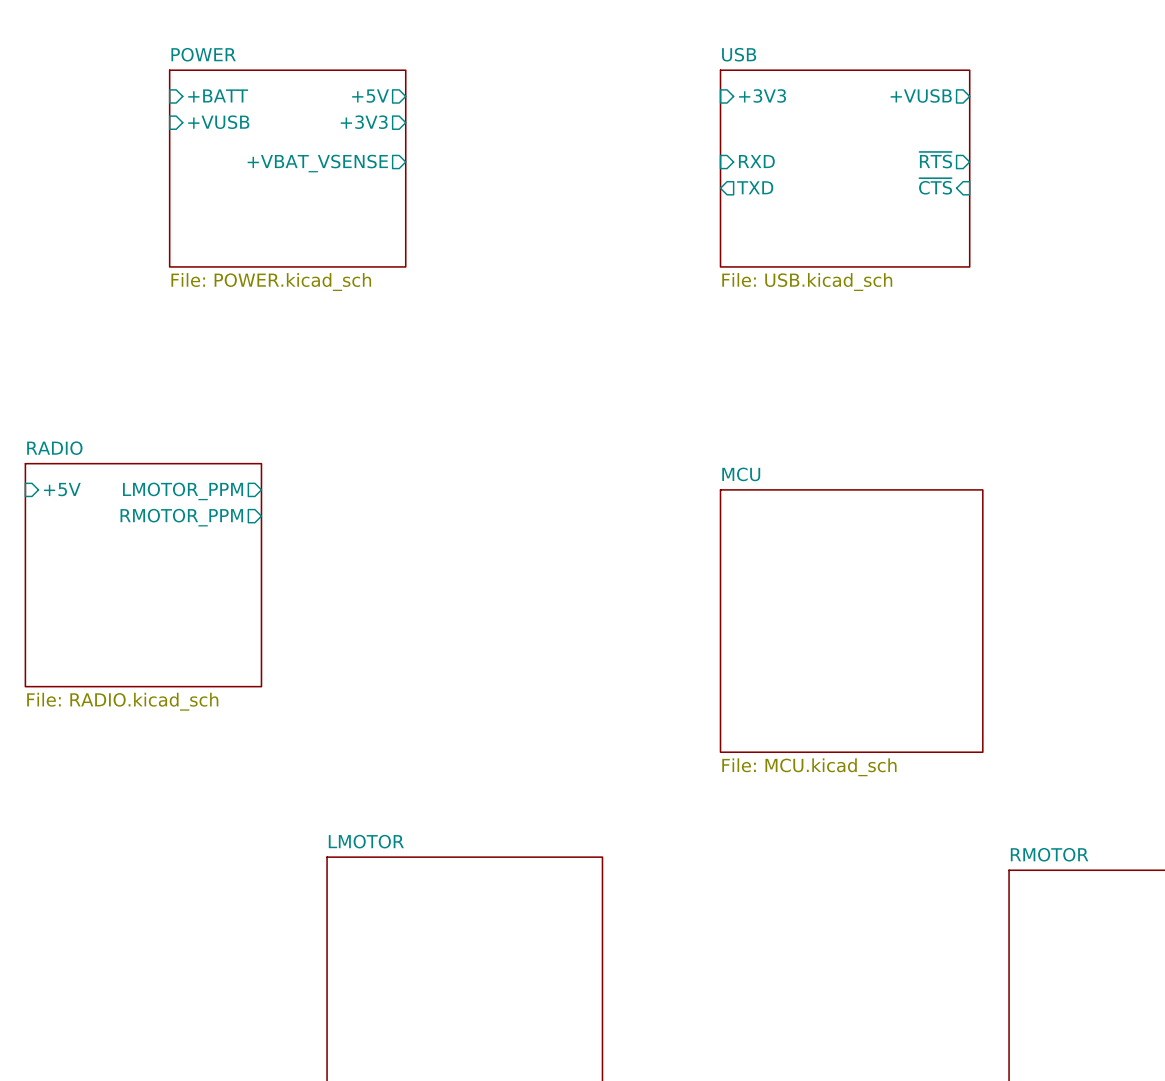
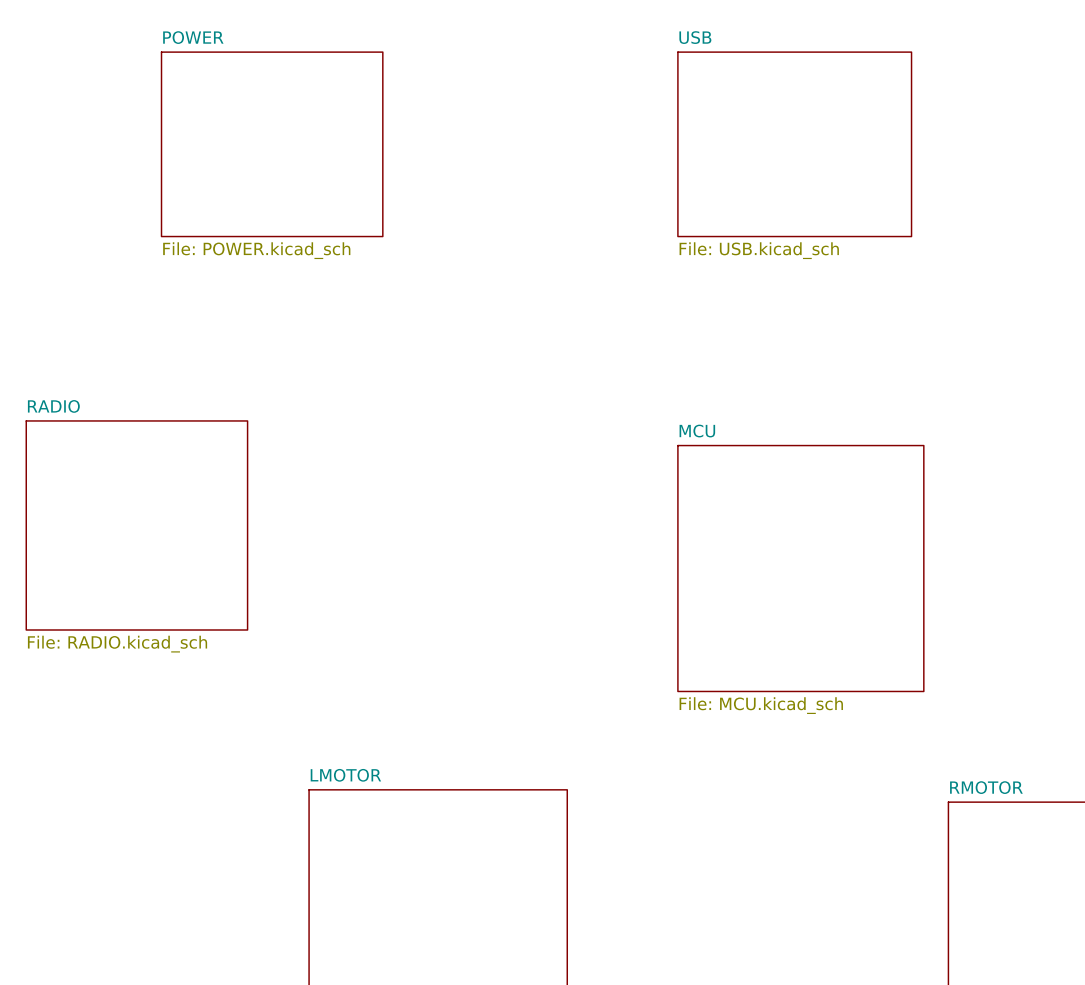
sheet pin: +BATT (218, 95) -> none
sheet pin: +3V3 (762, 95) -> none
sheet pin: +VUSB (921, 95) -> none
sheet pin: +5V (370, 96) -> none
sheet pin: +VUSB (218, 122) -> none
sheet pin: +3V3 (364, 122) -> none
sheet pin: ~{RTS} (935, 160) -> none
sheet pin: RXD (756, 161) -> none
sheet pin: +VBAT_VSENSE (317, 163) -> none
sheet pin: ~{CTS} (935, 186) -> none
sheet pin: TXD (755, 187) -> none
sheet pin: +5V (62, 489) -> none
sheet pin: LMOTOR_PPM (183, 491) -> none
sheet pin: RMOTOR_PPM (181, 517) -> none

